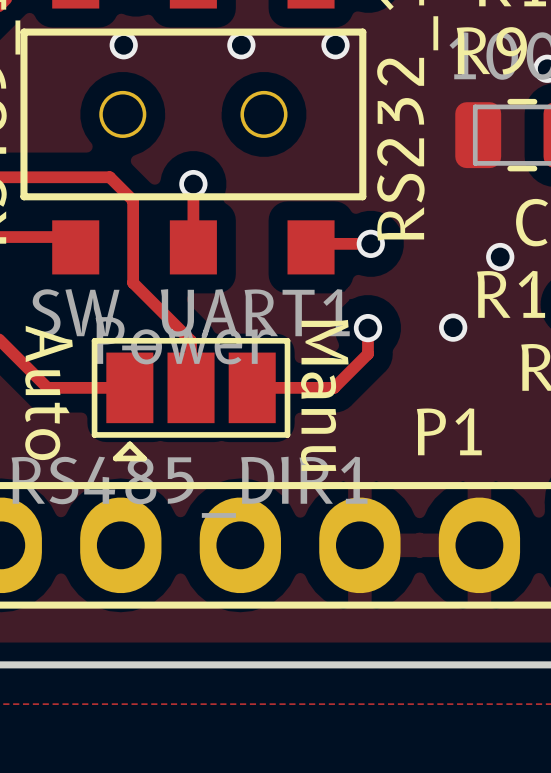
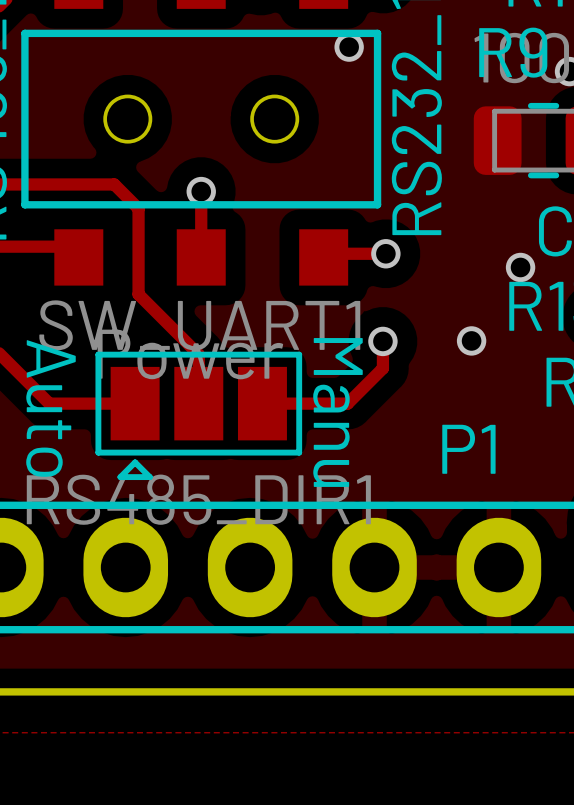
via: (123, 45) -> none
via: (241, 45) -> none

